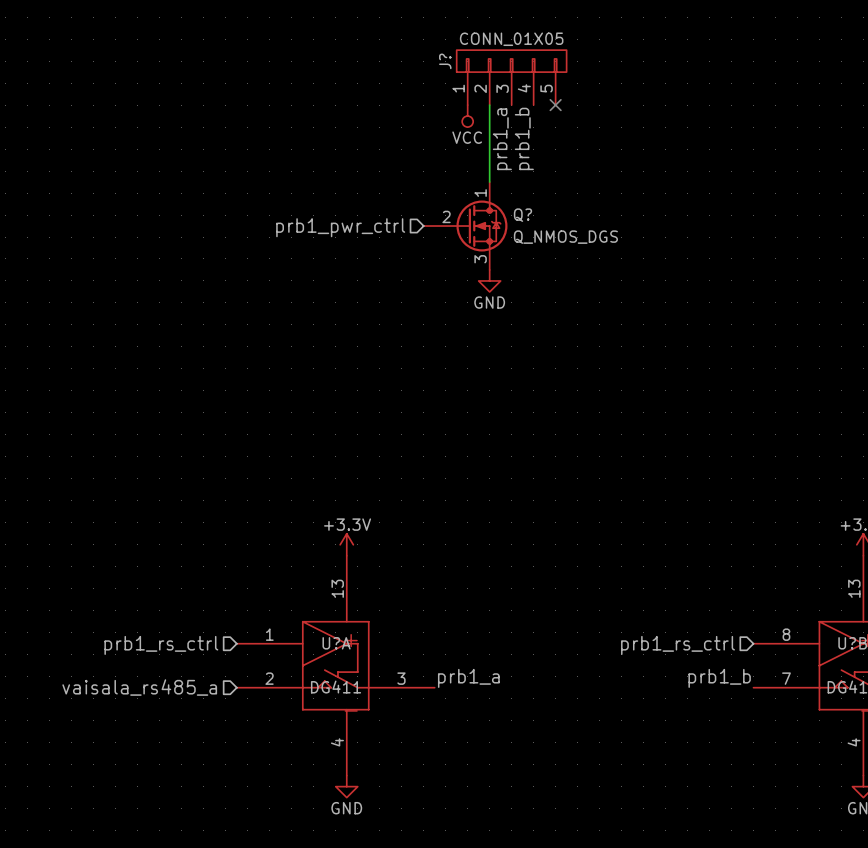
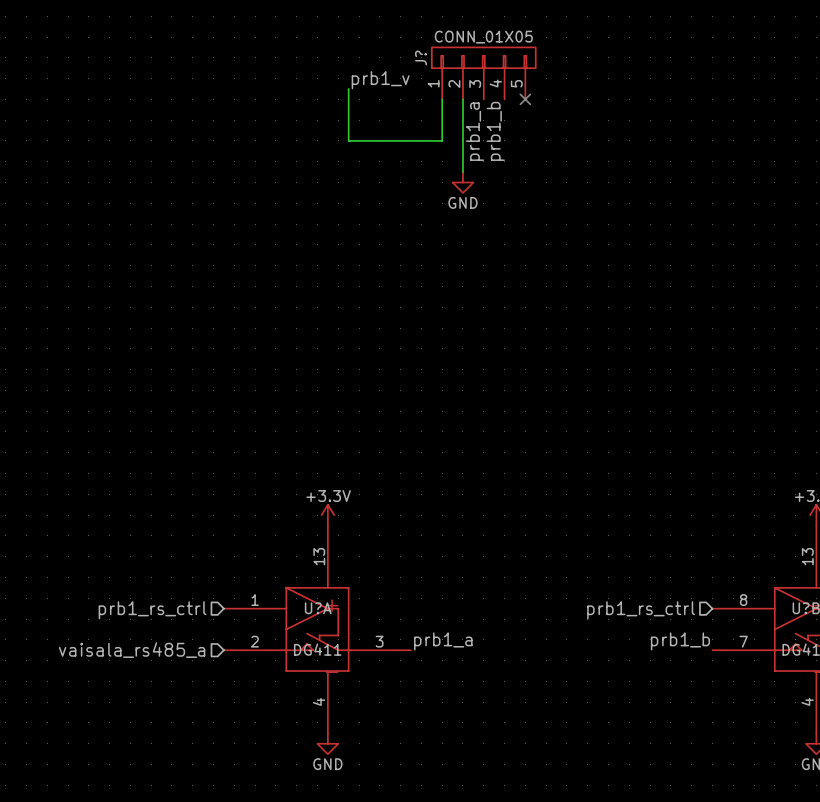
label: none -> prb1_v (380, 80)
wire: none -> (348, 88) (348, 140) (442, 140) (442, 99)
power symbol: VCC (467, 116) -> none
Q?: Q_NMOS_DGS (465, 226) -> none
hierarchical label: prb1_pwr_ctrl (340, 227) -> none
power symbol position: GND (489, 280) -> GND (462, 182)

